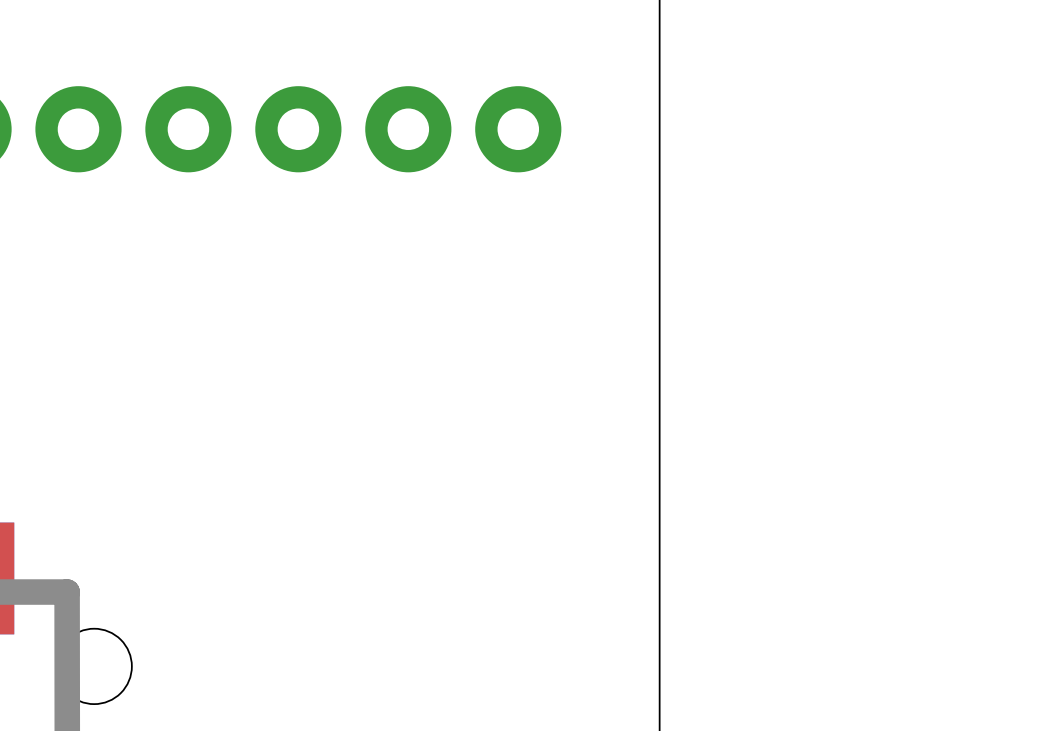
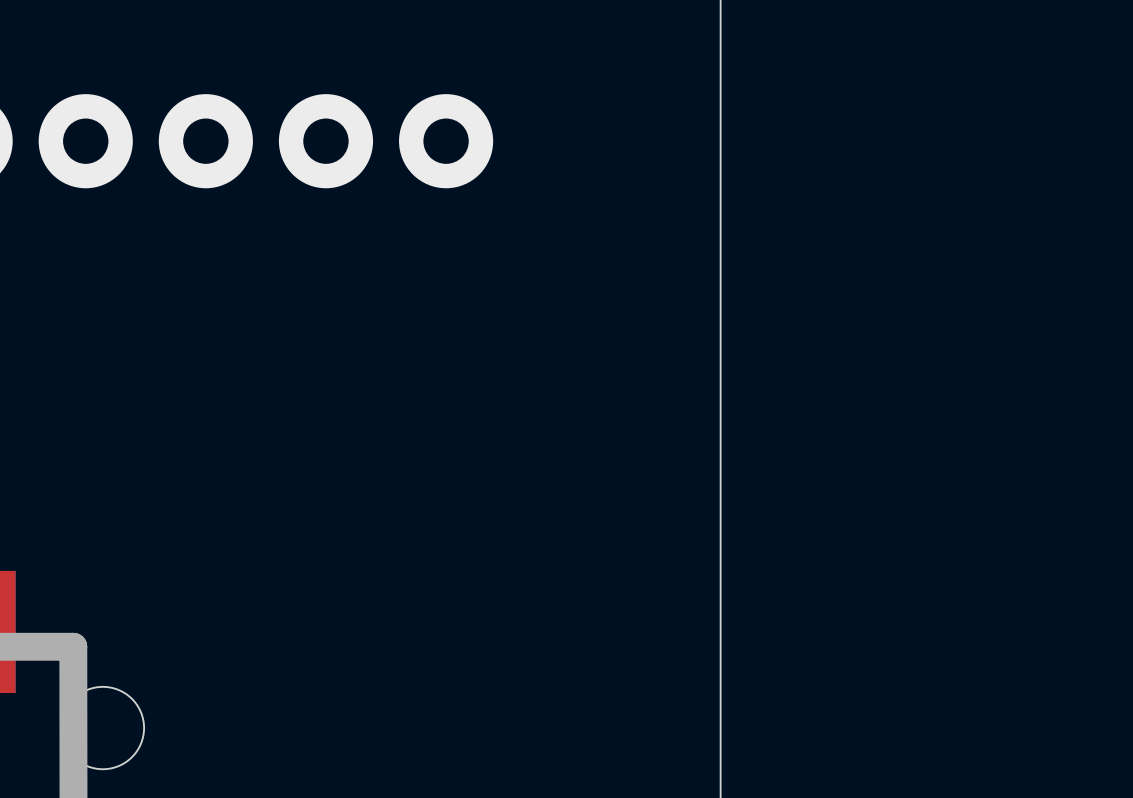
via: (518, 129) -> none

